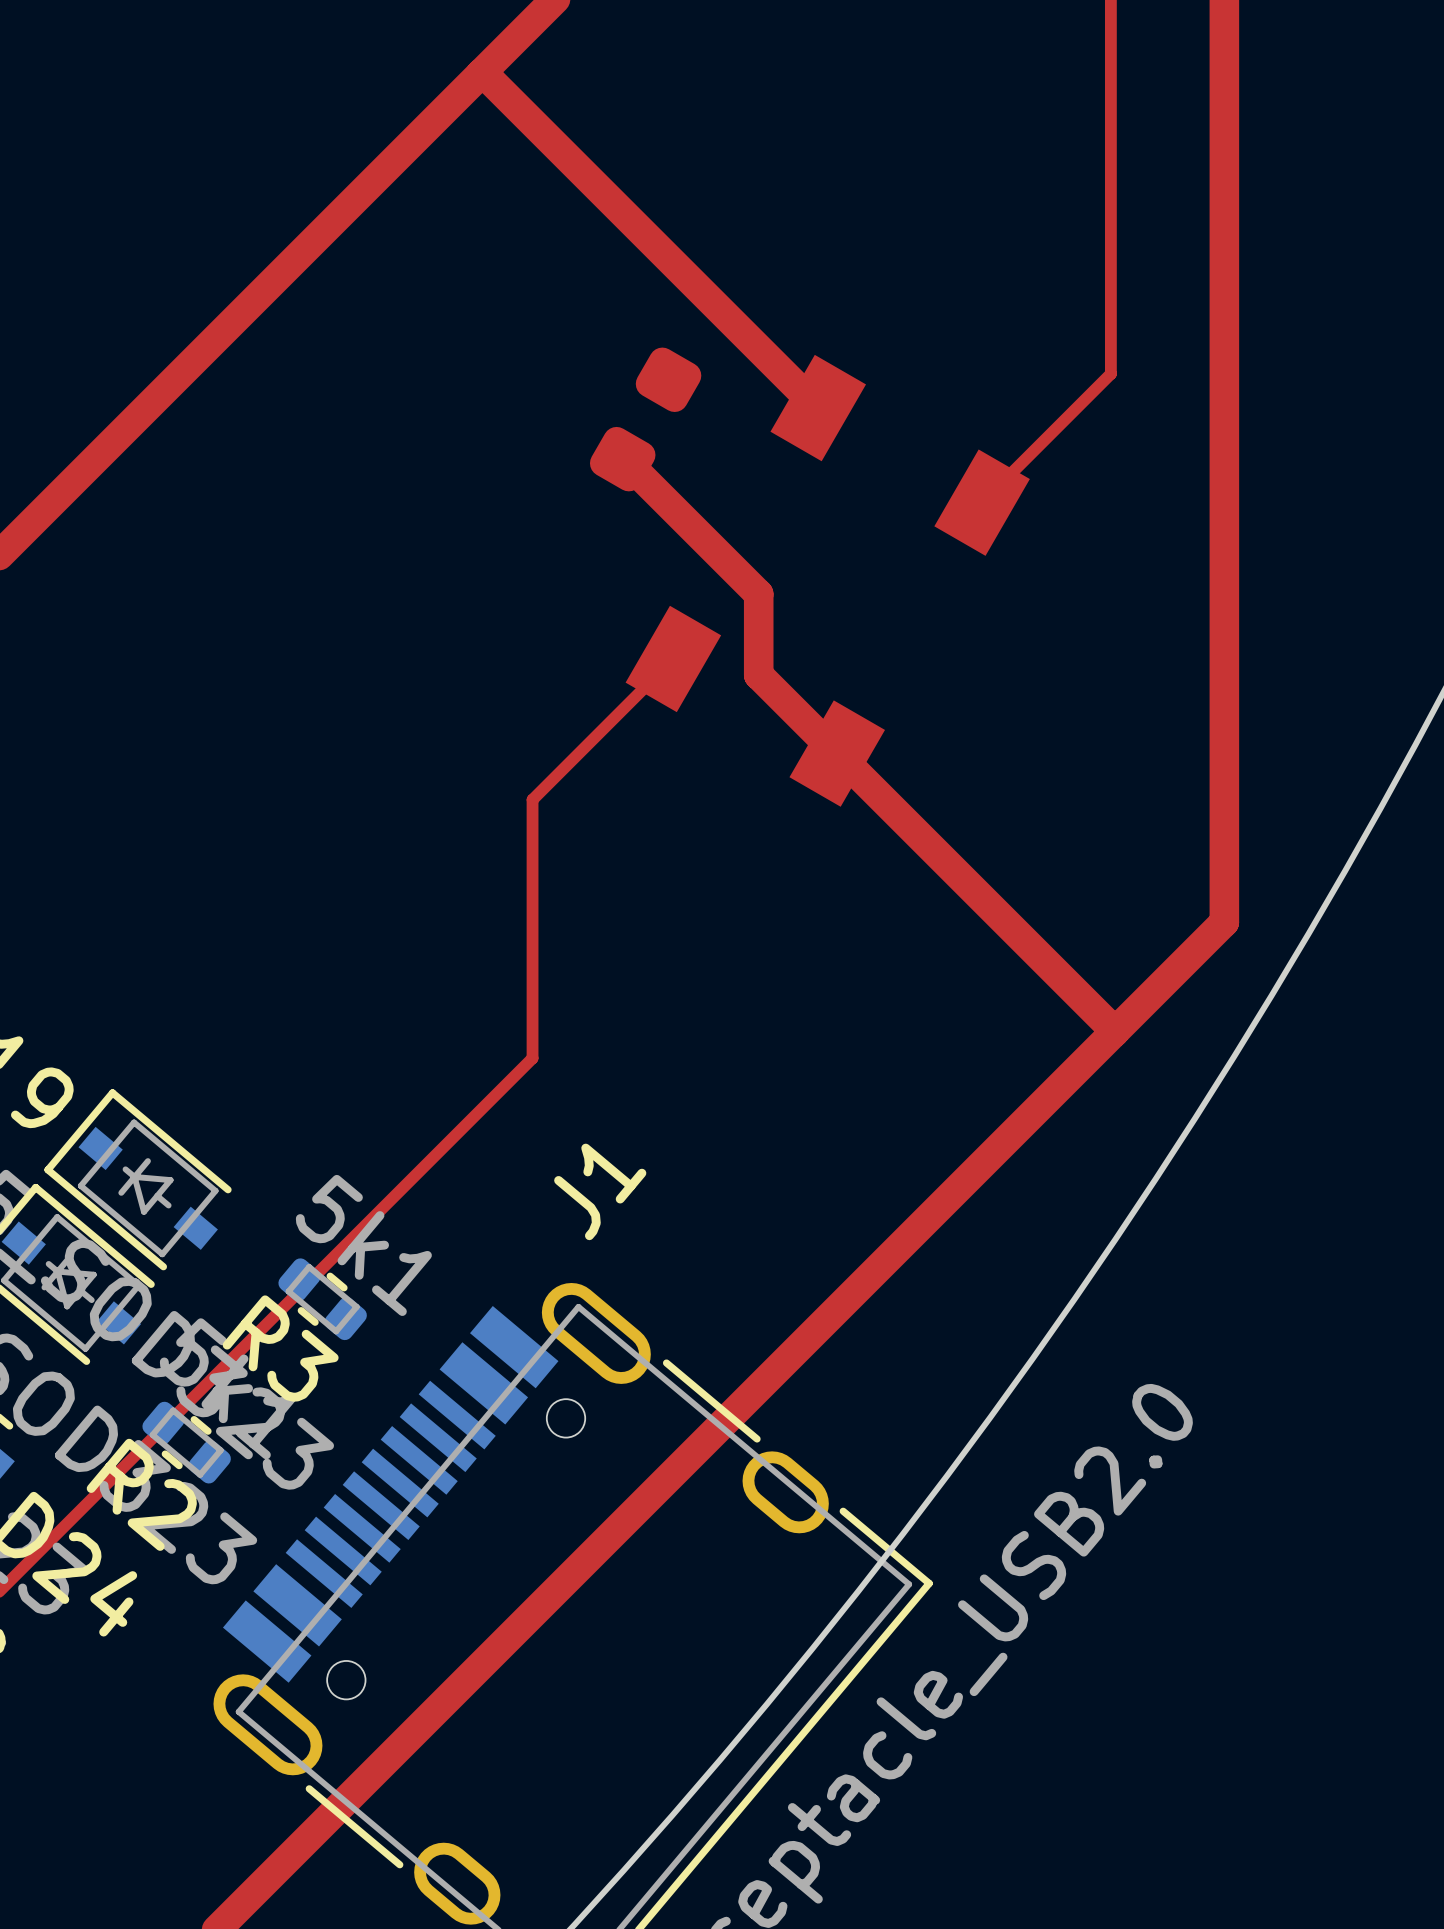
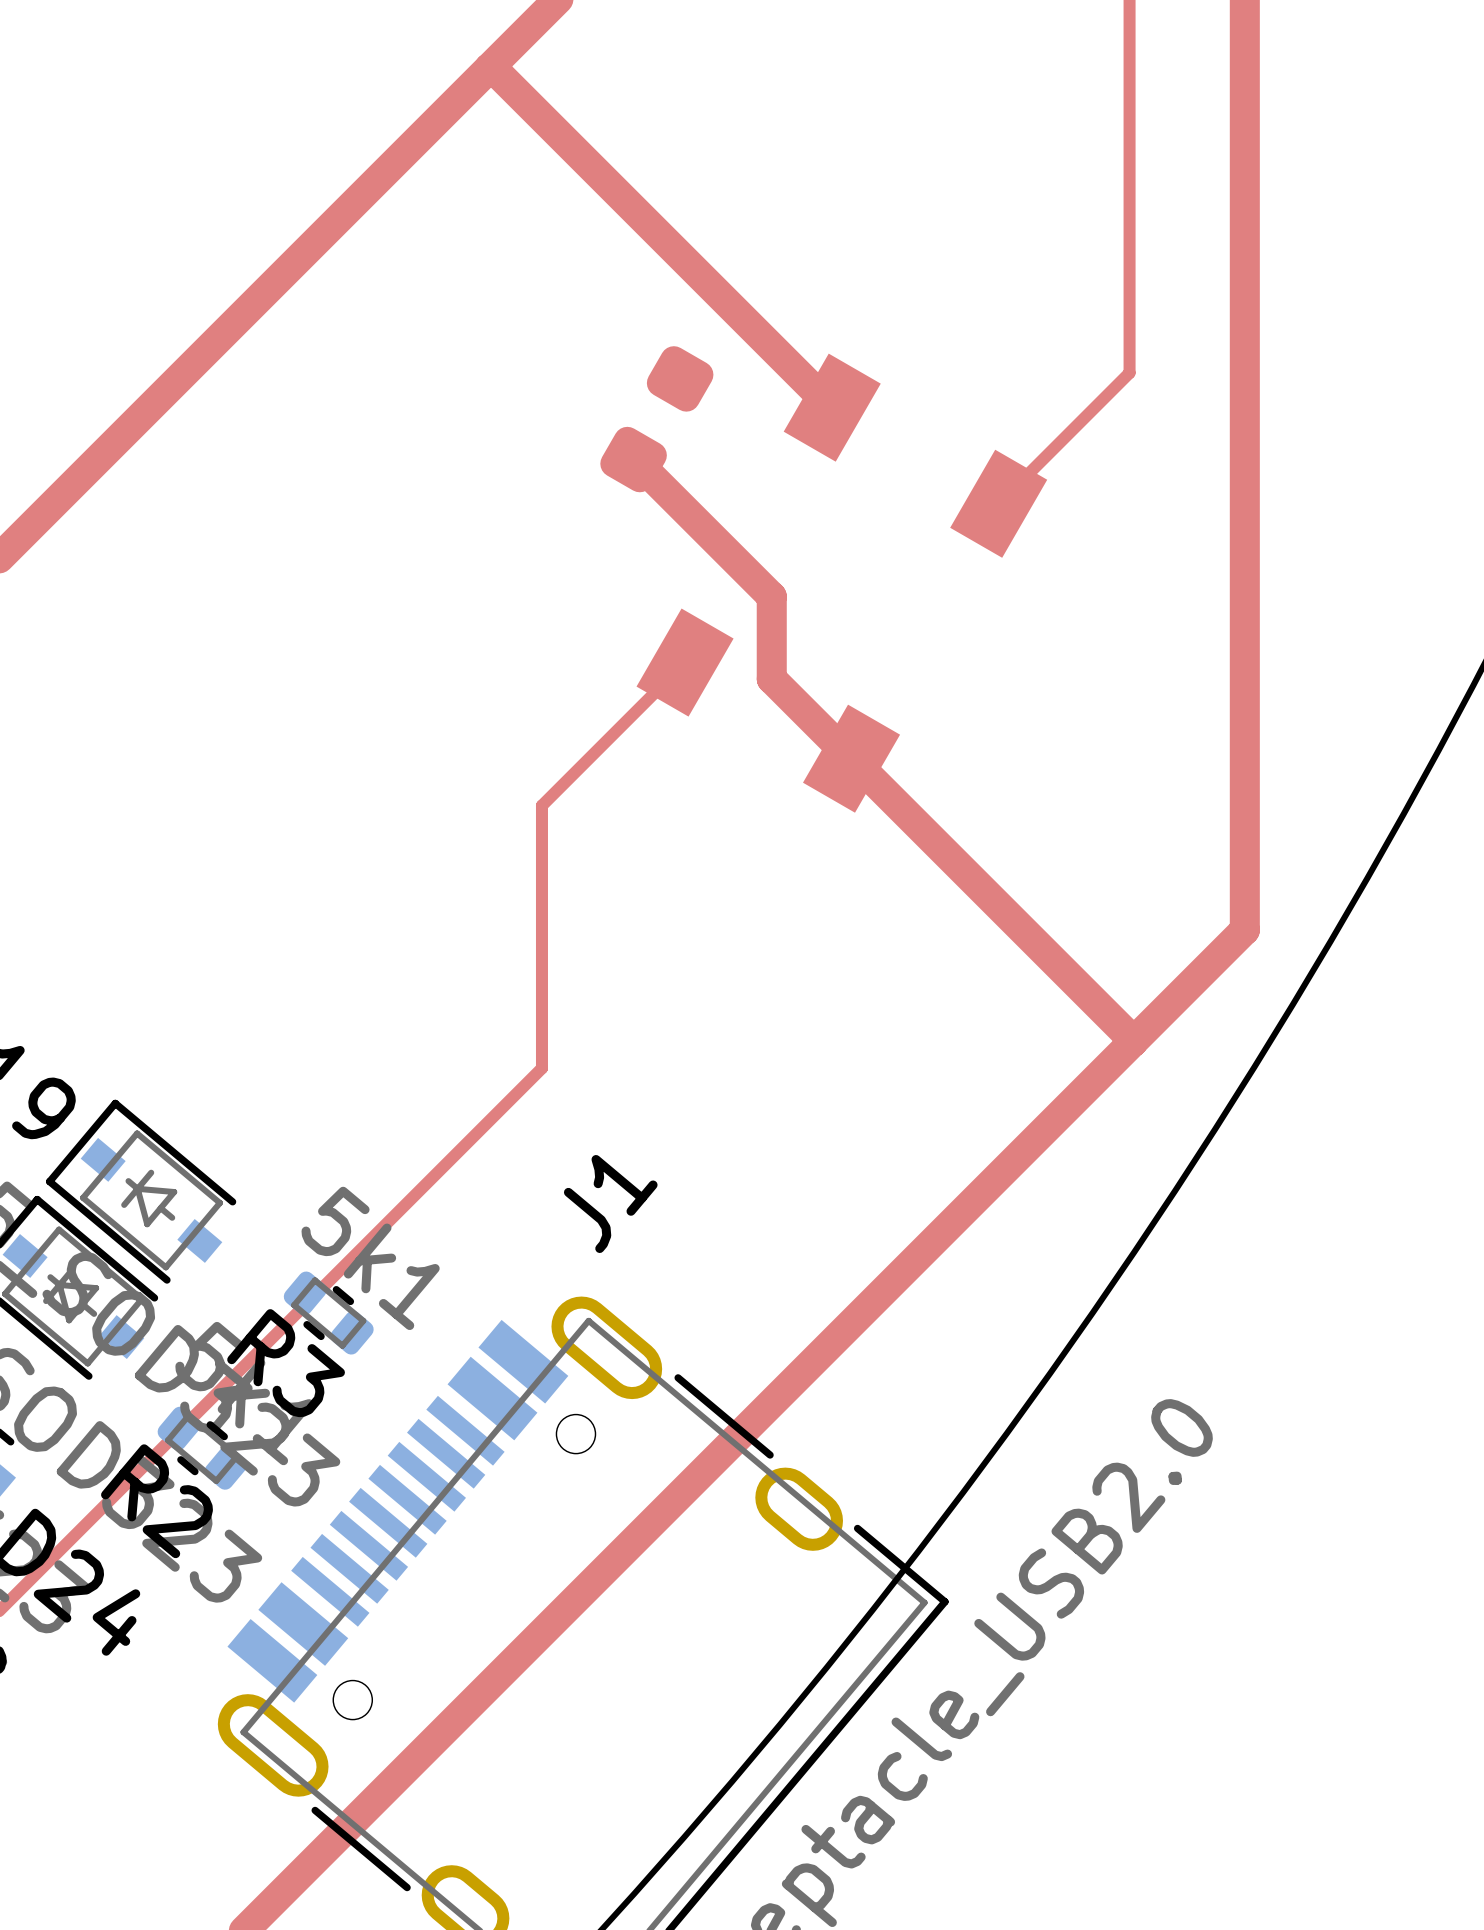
R2 position: (186, 1442) -> (202, 1448)

